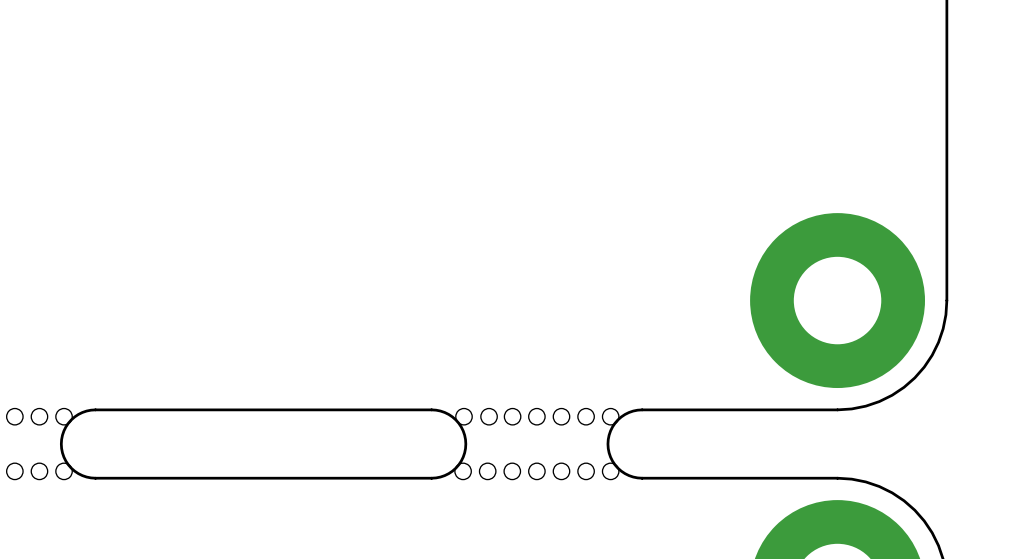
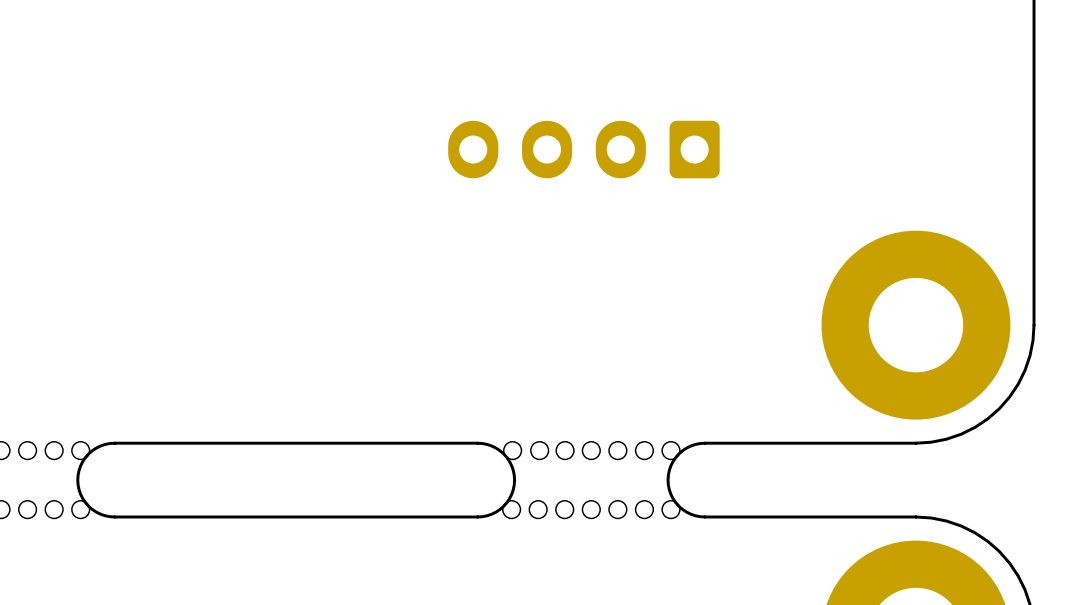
part: none -> (583, 149)

